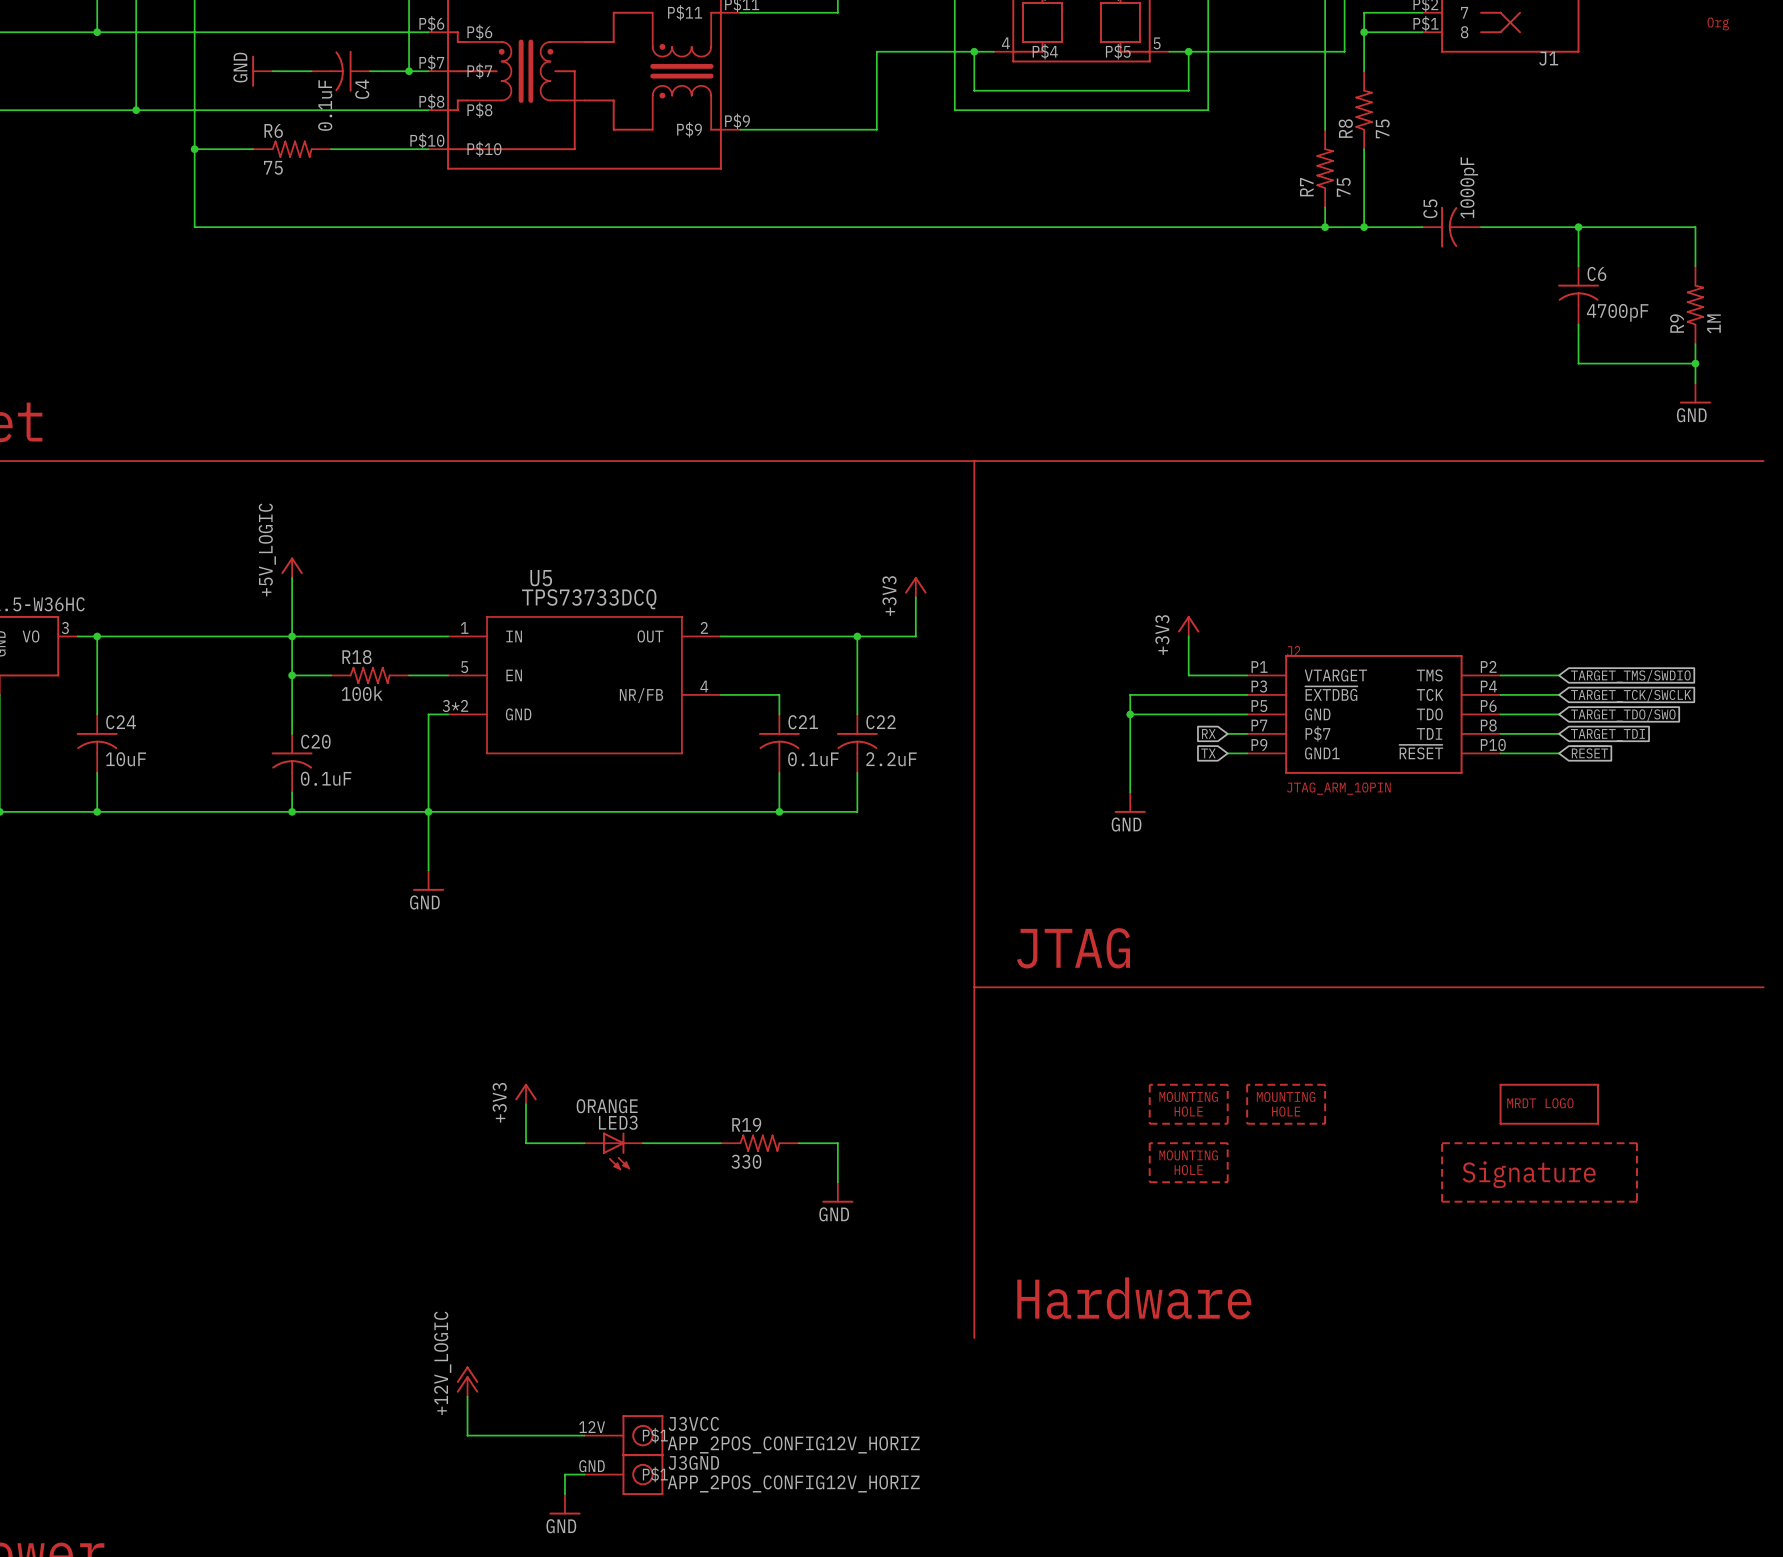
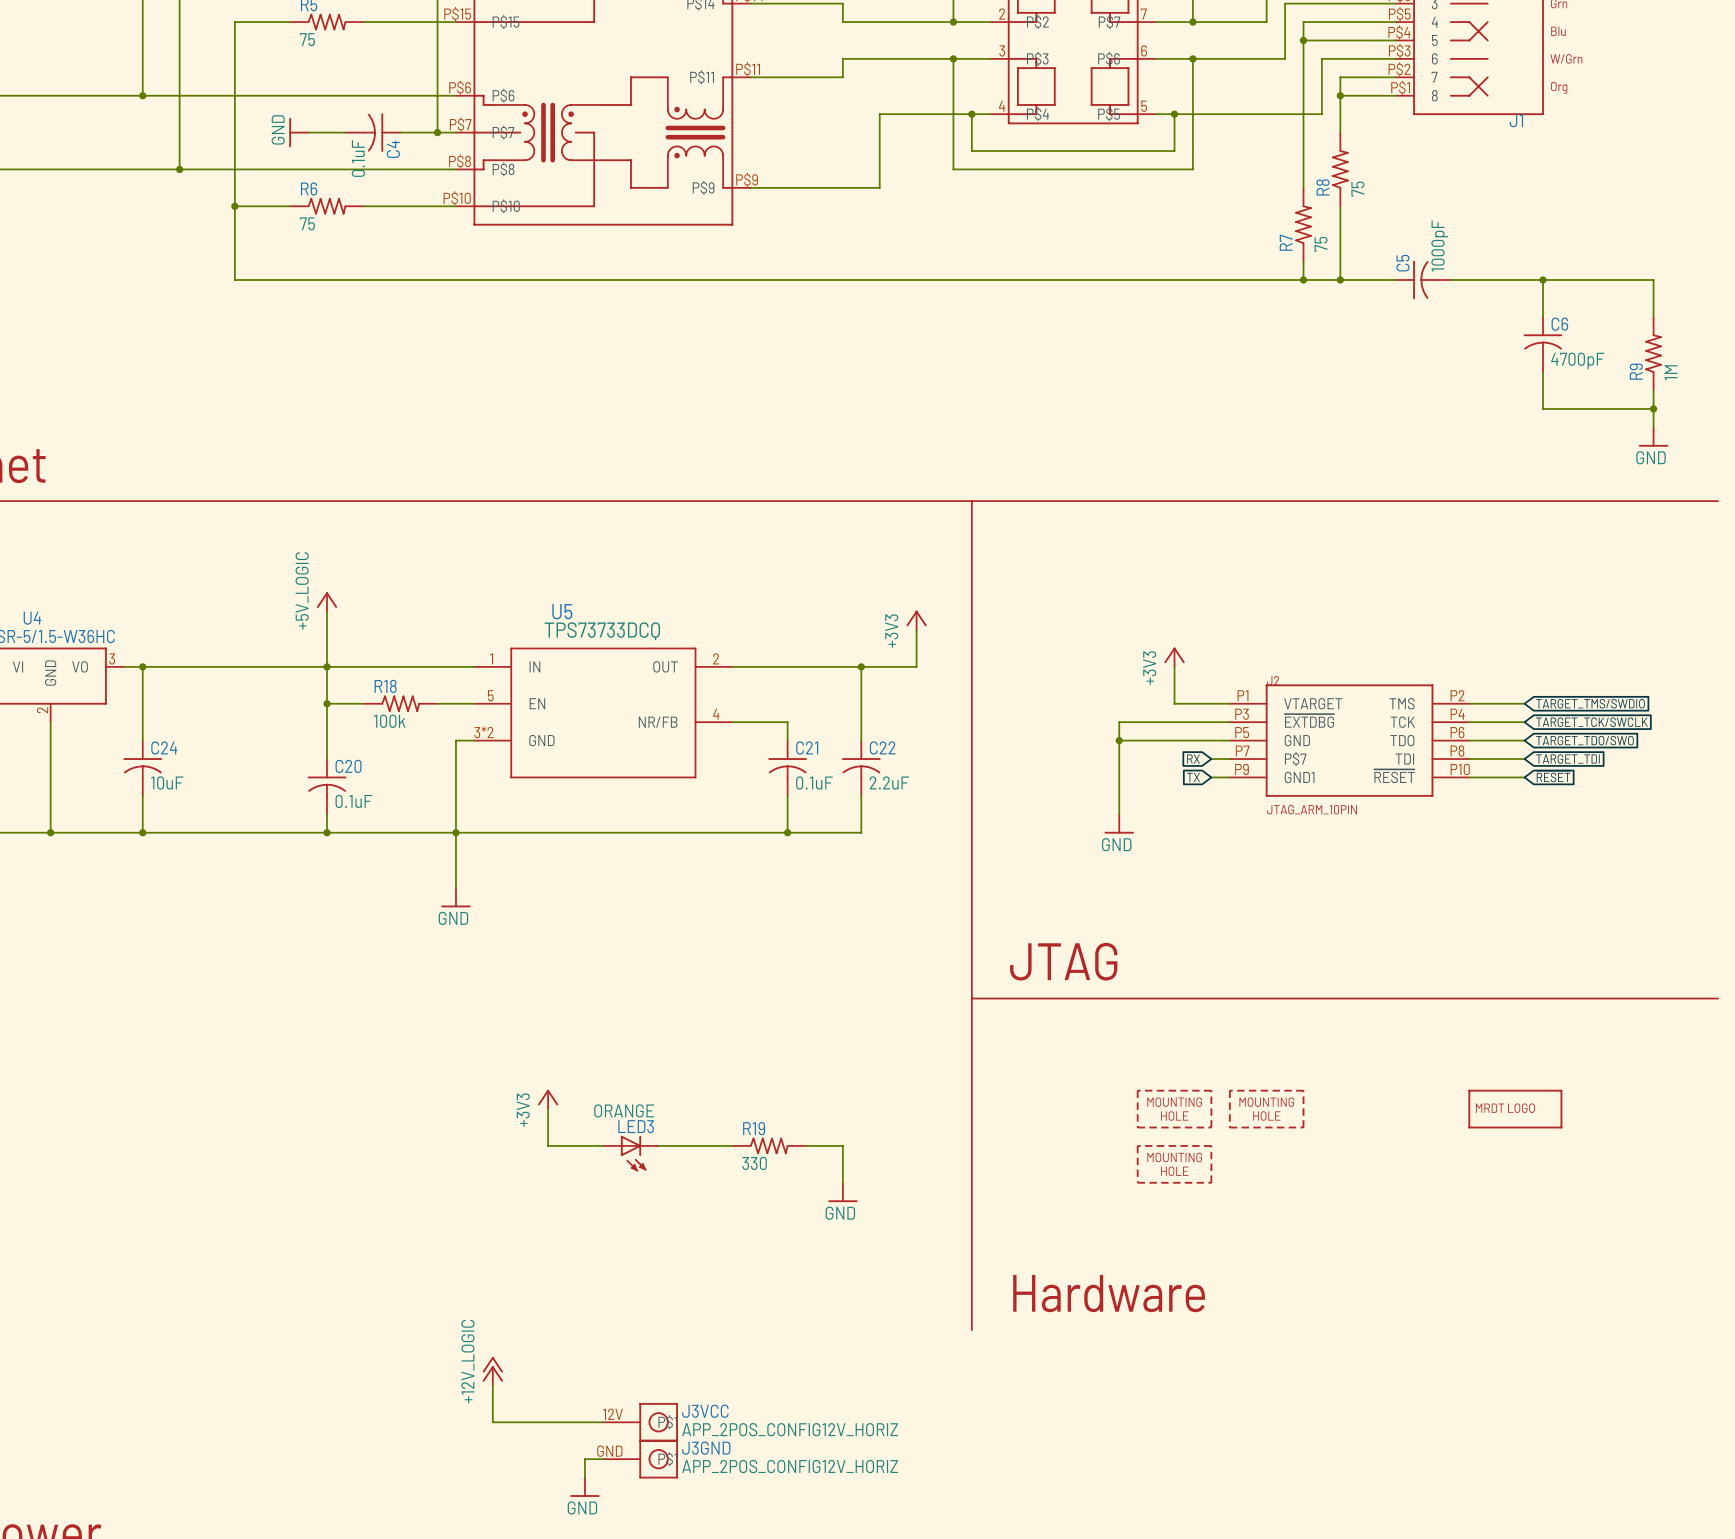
part: (1539, 1172) -> none

